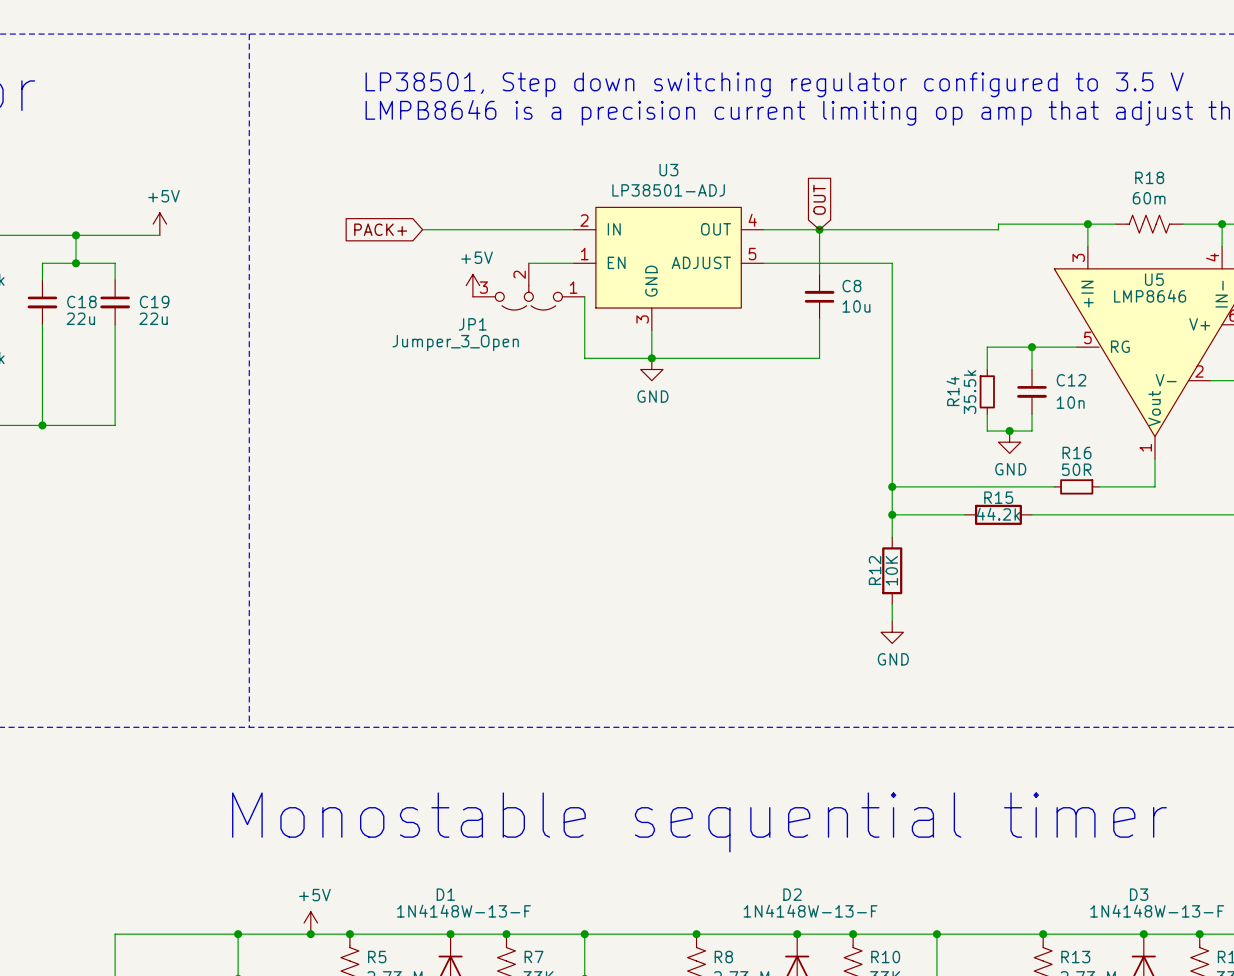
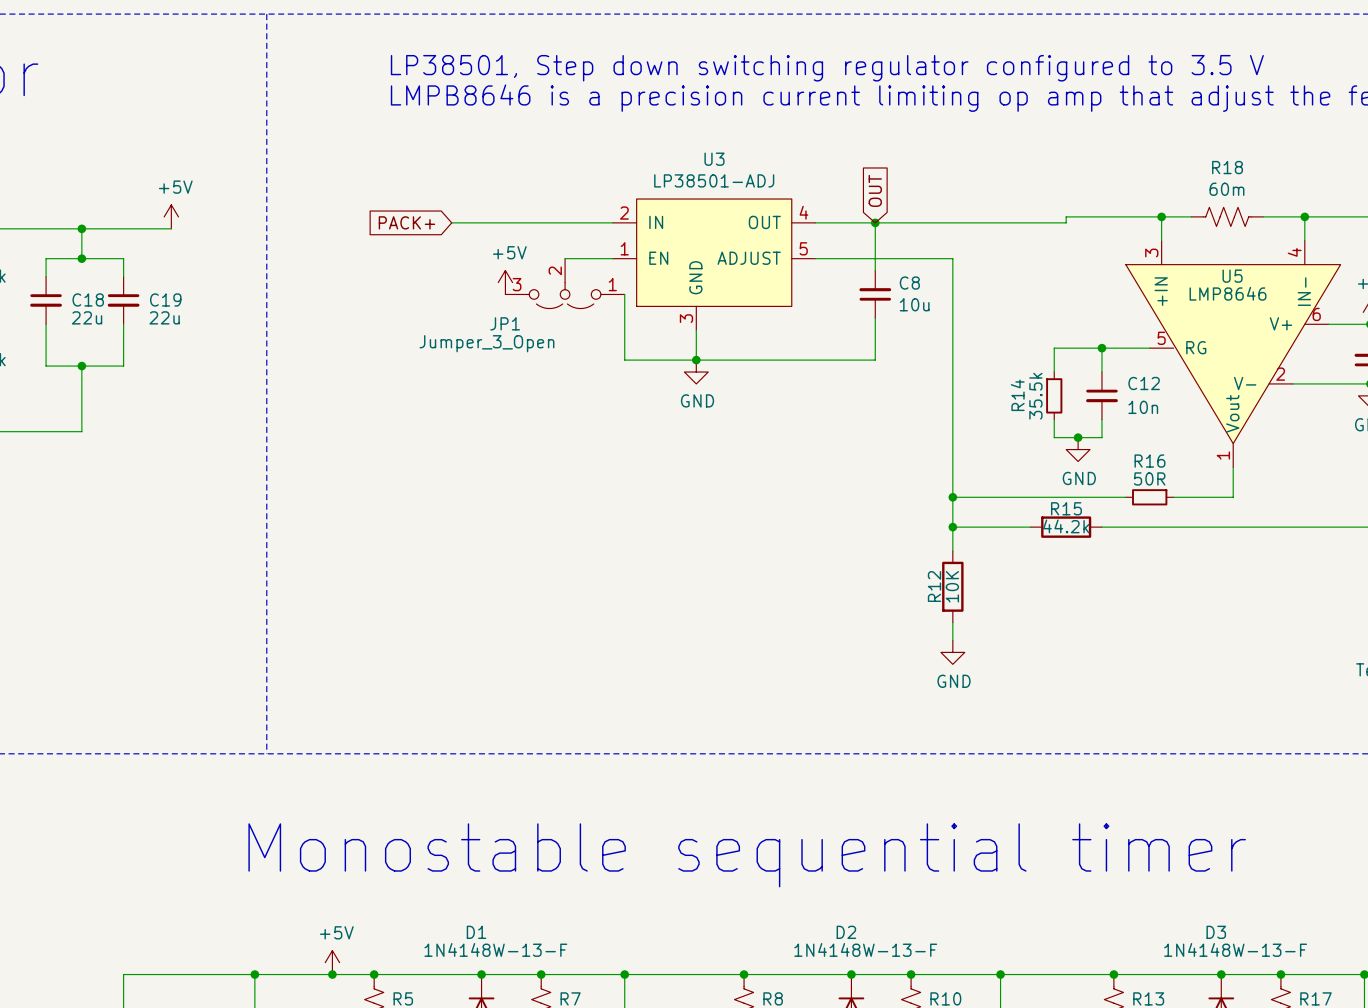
wire: (42, 363) (42, 425) -> (46, 366) (123, 366)
junction: none -> (81, 366)
wire: (115, 363) (115, 425) (75, 425) -> (81, 366) (81, 431)
junction: (42, 425) -> none

